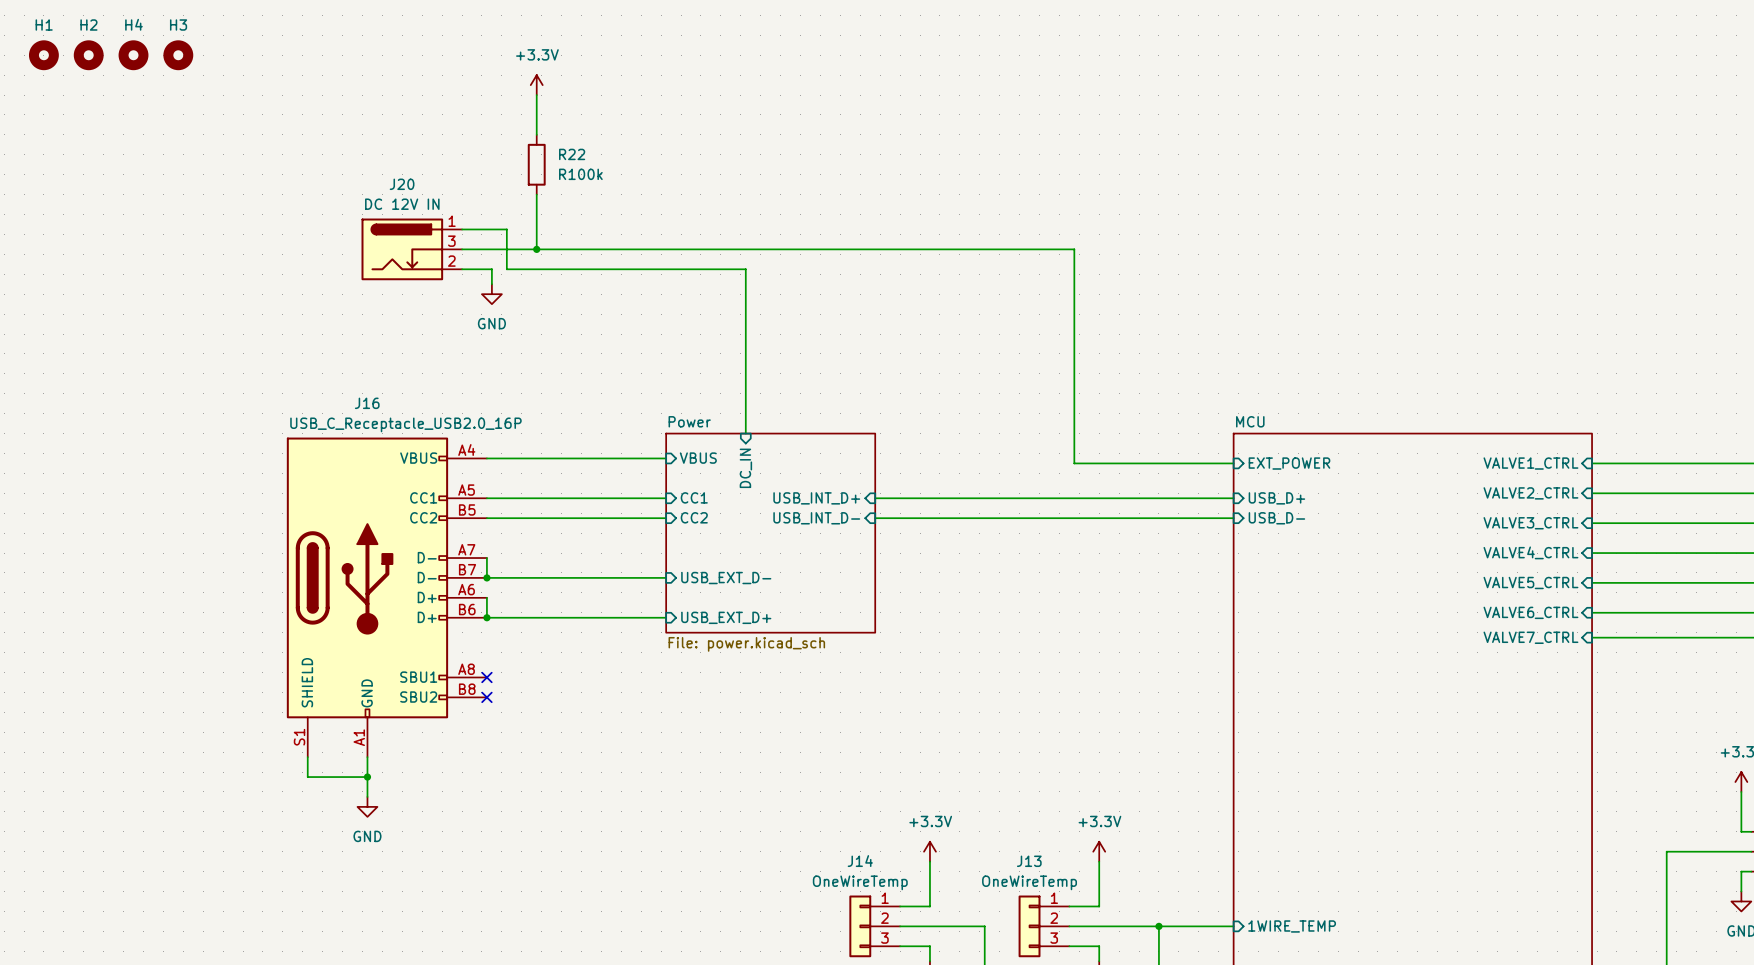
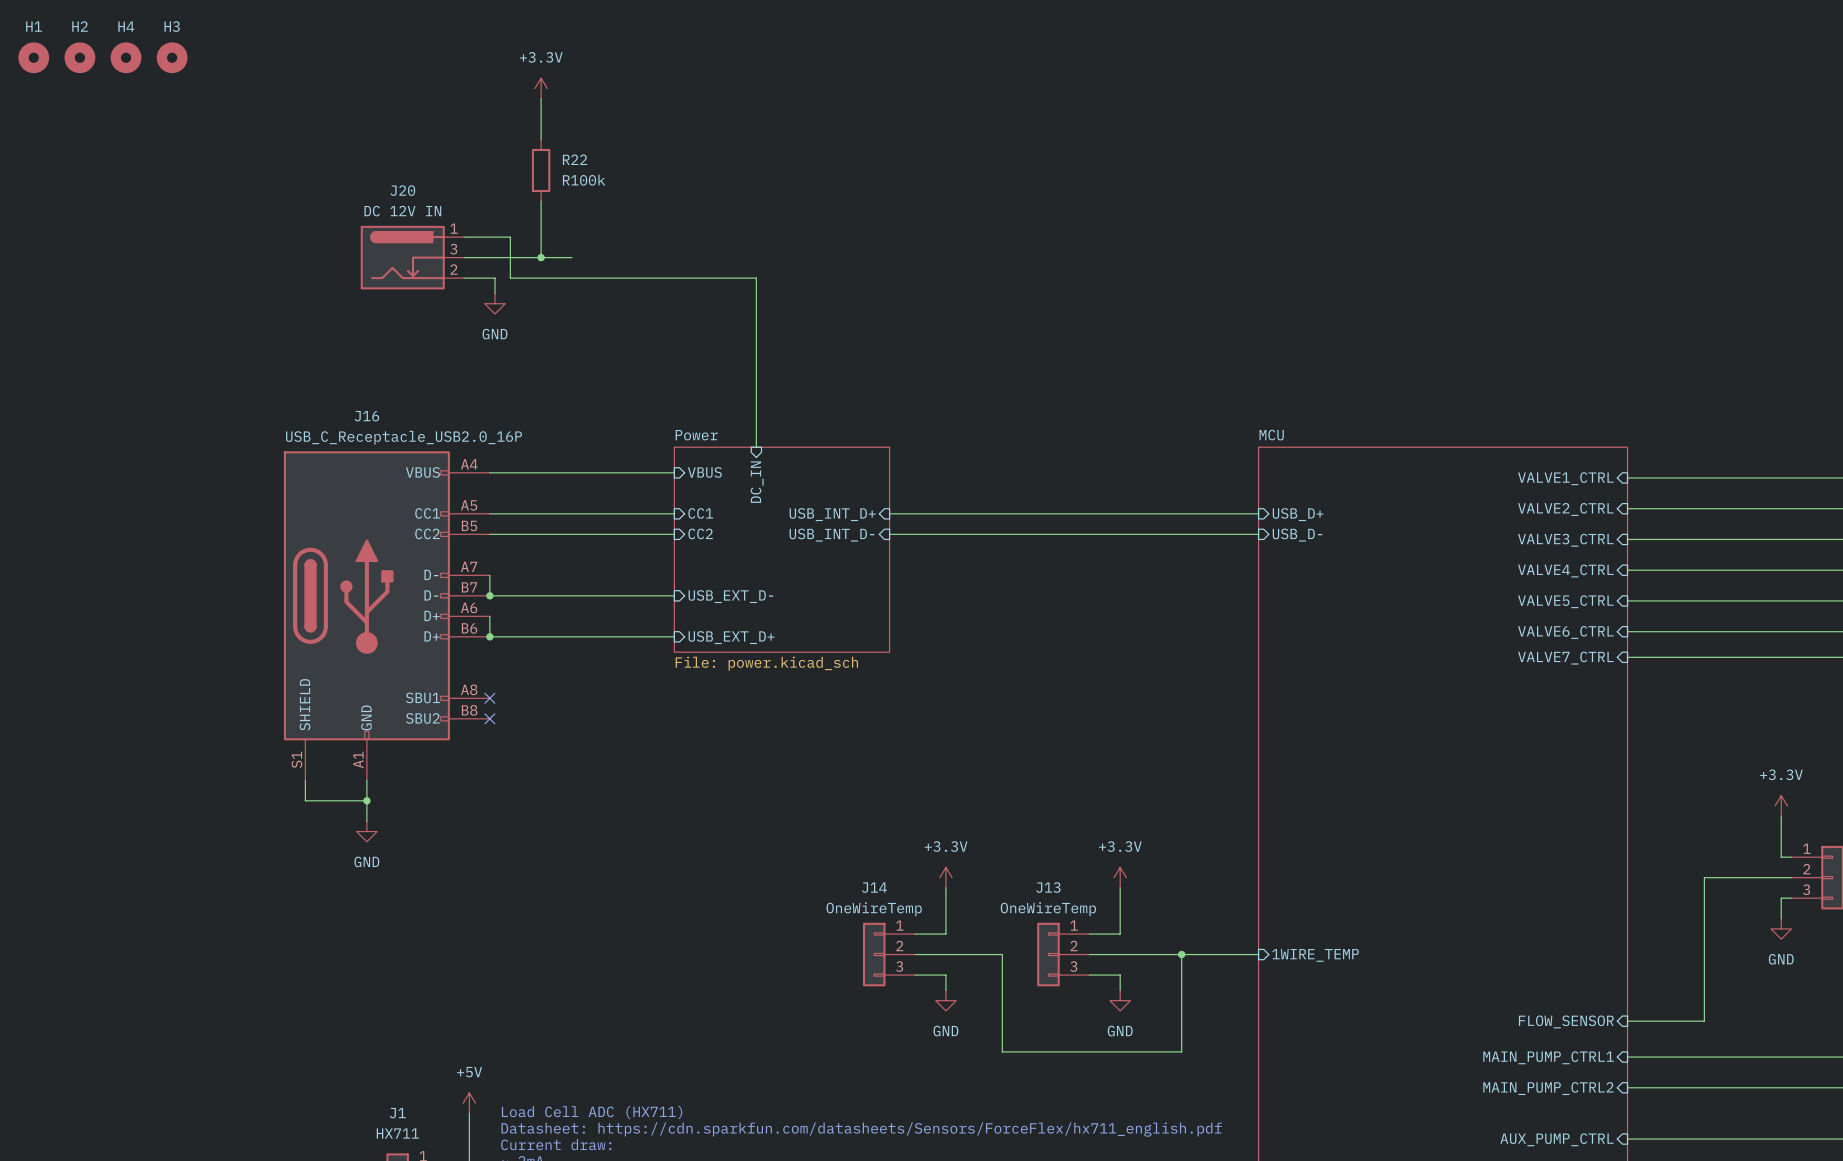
wire: (566, 249) (1074, 249) (1074, 463) (1233, 463) -> none
sheet pin: EXT_POWER (1289, 463) -> none

